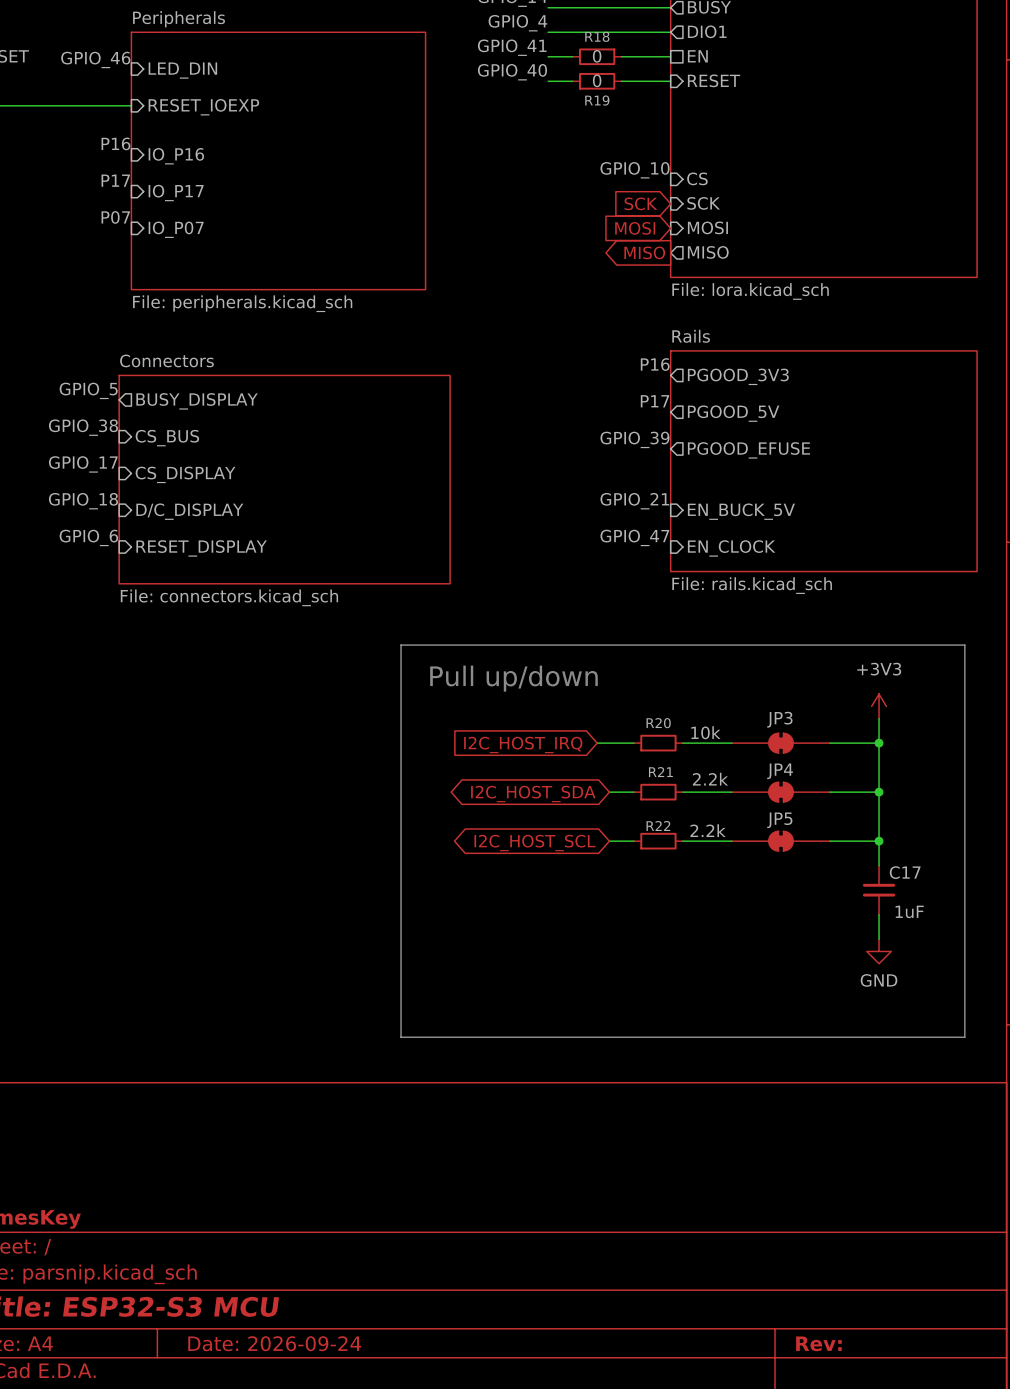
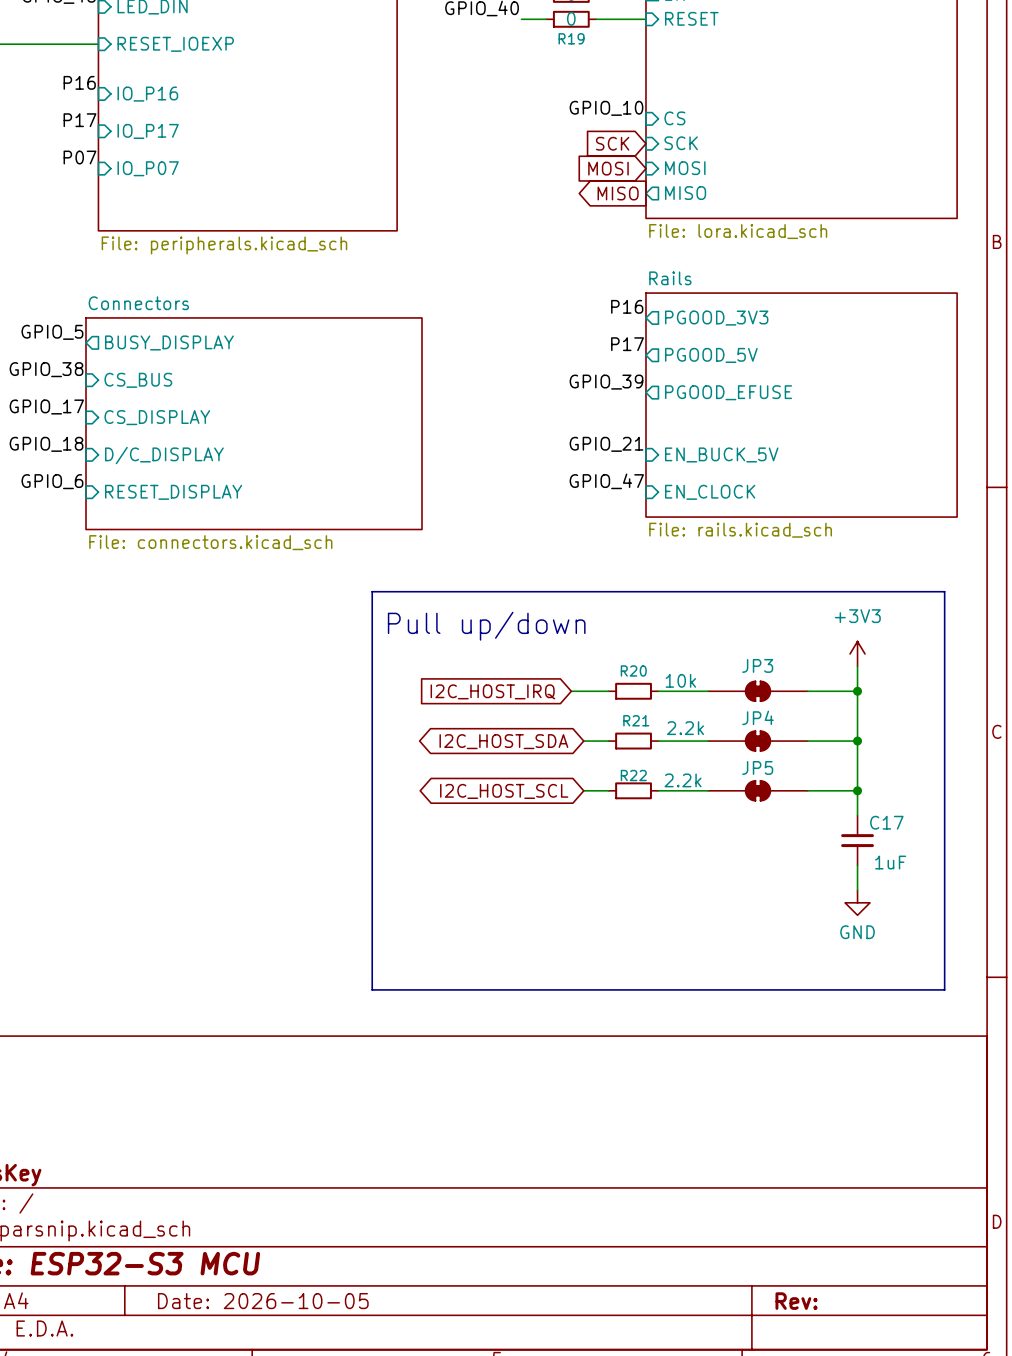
title block: Date: 2026-09-24 (274, 1343) -> Date: 2026-10-05 (263, 1301)

